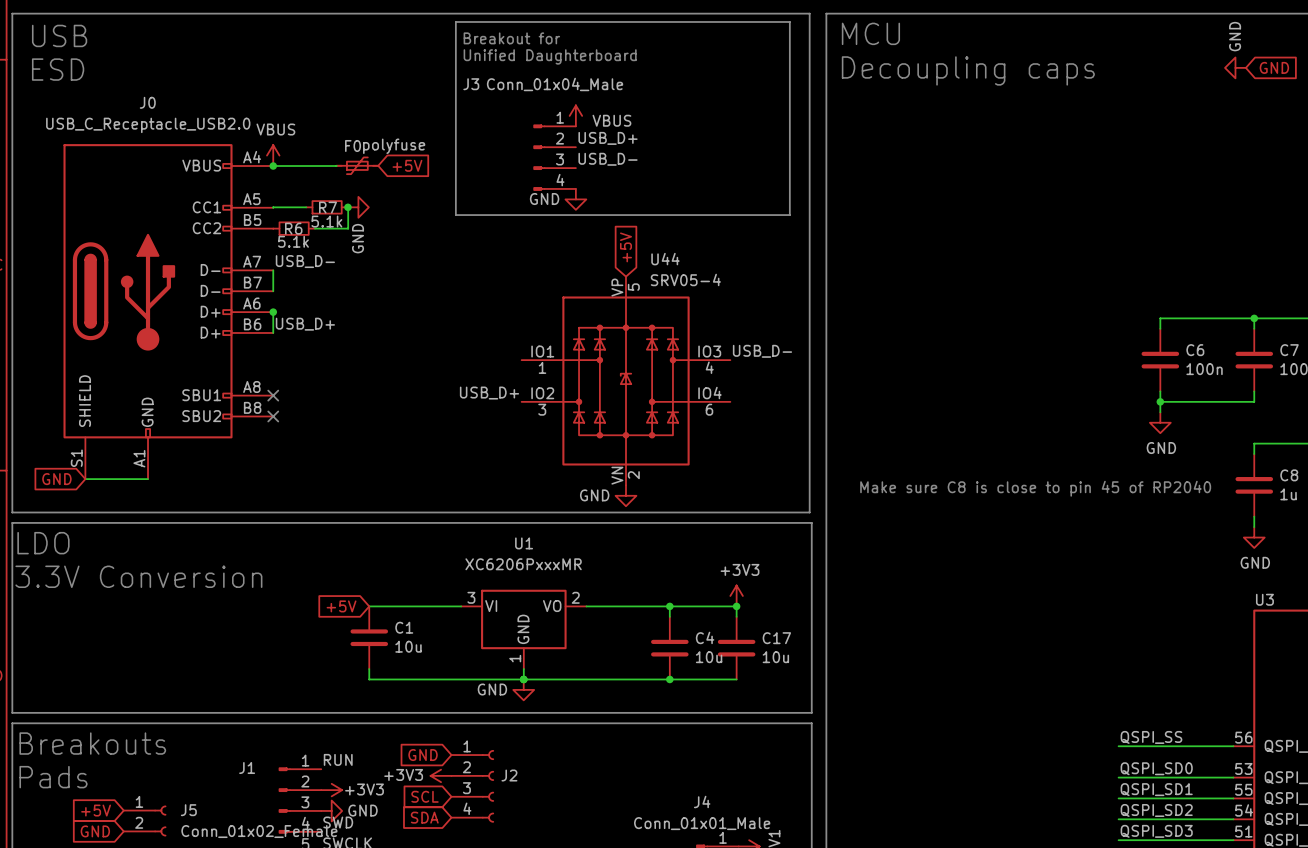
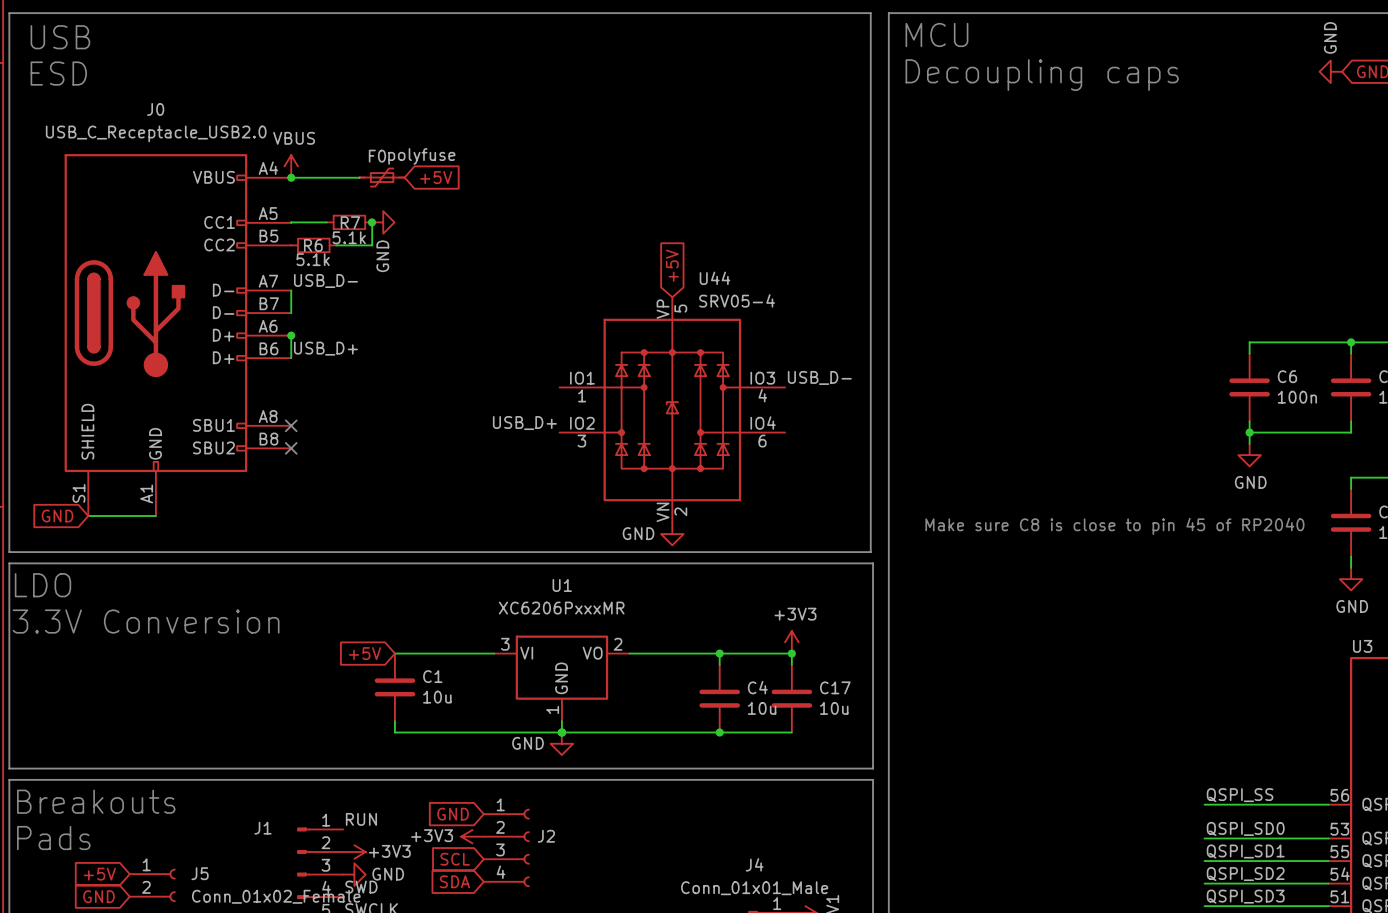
line: (455, 21) (455, 215) (789, 215) (789, 21) (455, 21) -> none
text: Breakout for (511, 38) -> none
text: Unified Daughterboard (550, 56) -> none
power symbol: VBUS (575, 115) -> none
label: USB_D+ (608, 138) -> none
J3: Conn_01x04_Male (554, 157) -> none
label: USB_D- (608, 159) -> none
power symbol: GND (575, 199) -> none

